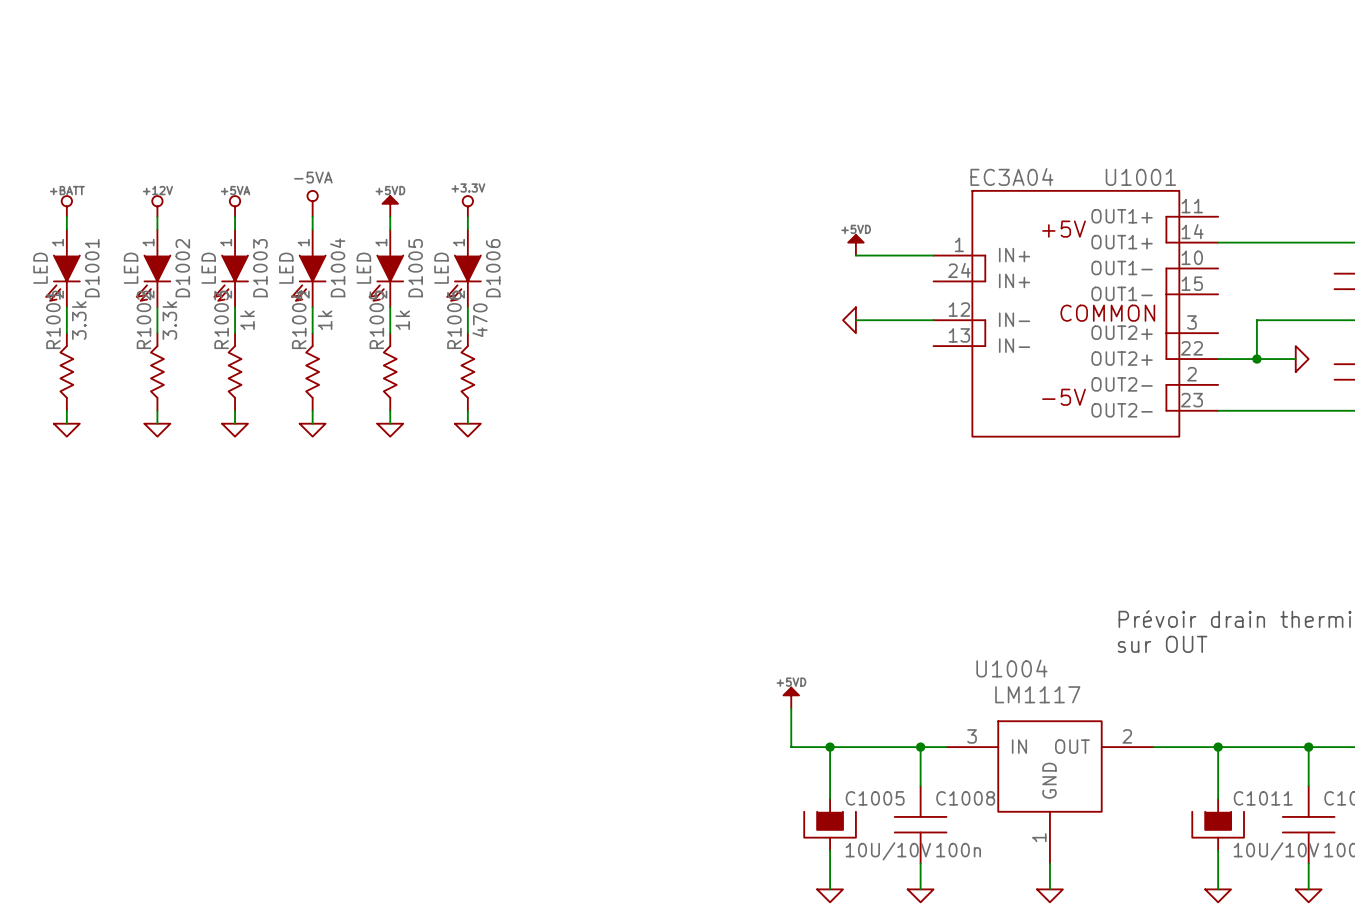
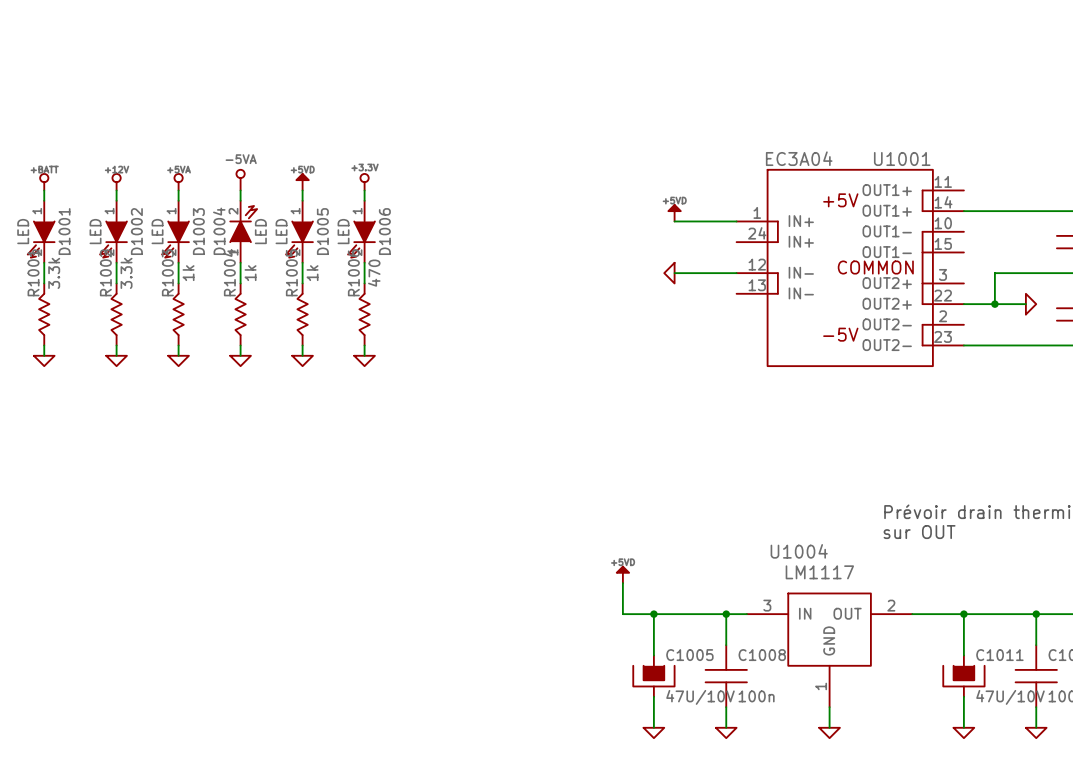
D1004 rotation: 0° (308, 278) -> 180° (243, 224)
C1005 value: 10U/10V (888, 851) -> 47U/10V (700, 697)
C1011 value: 10U/10V (1276, 851) -> 47U/10V (1010, 697)

